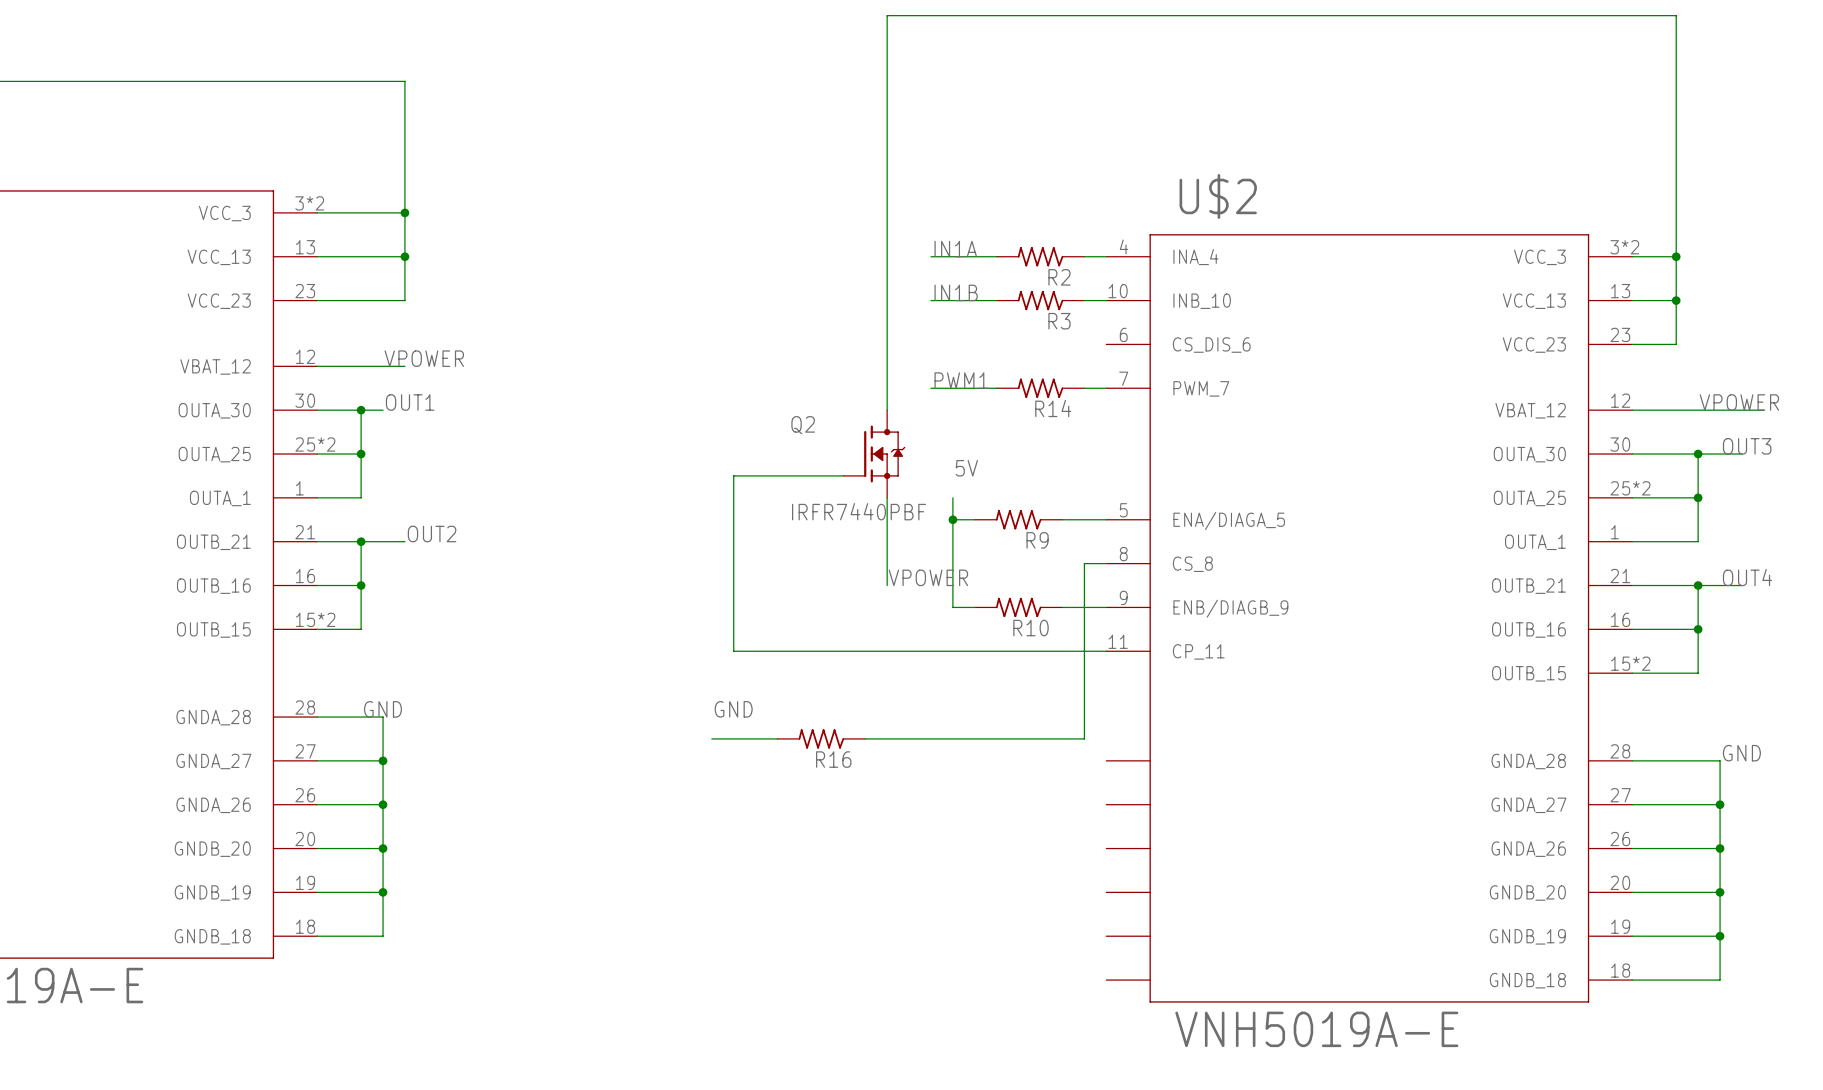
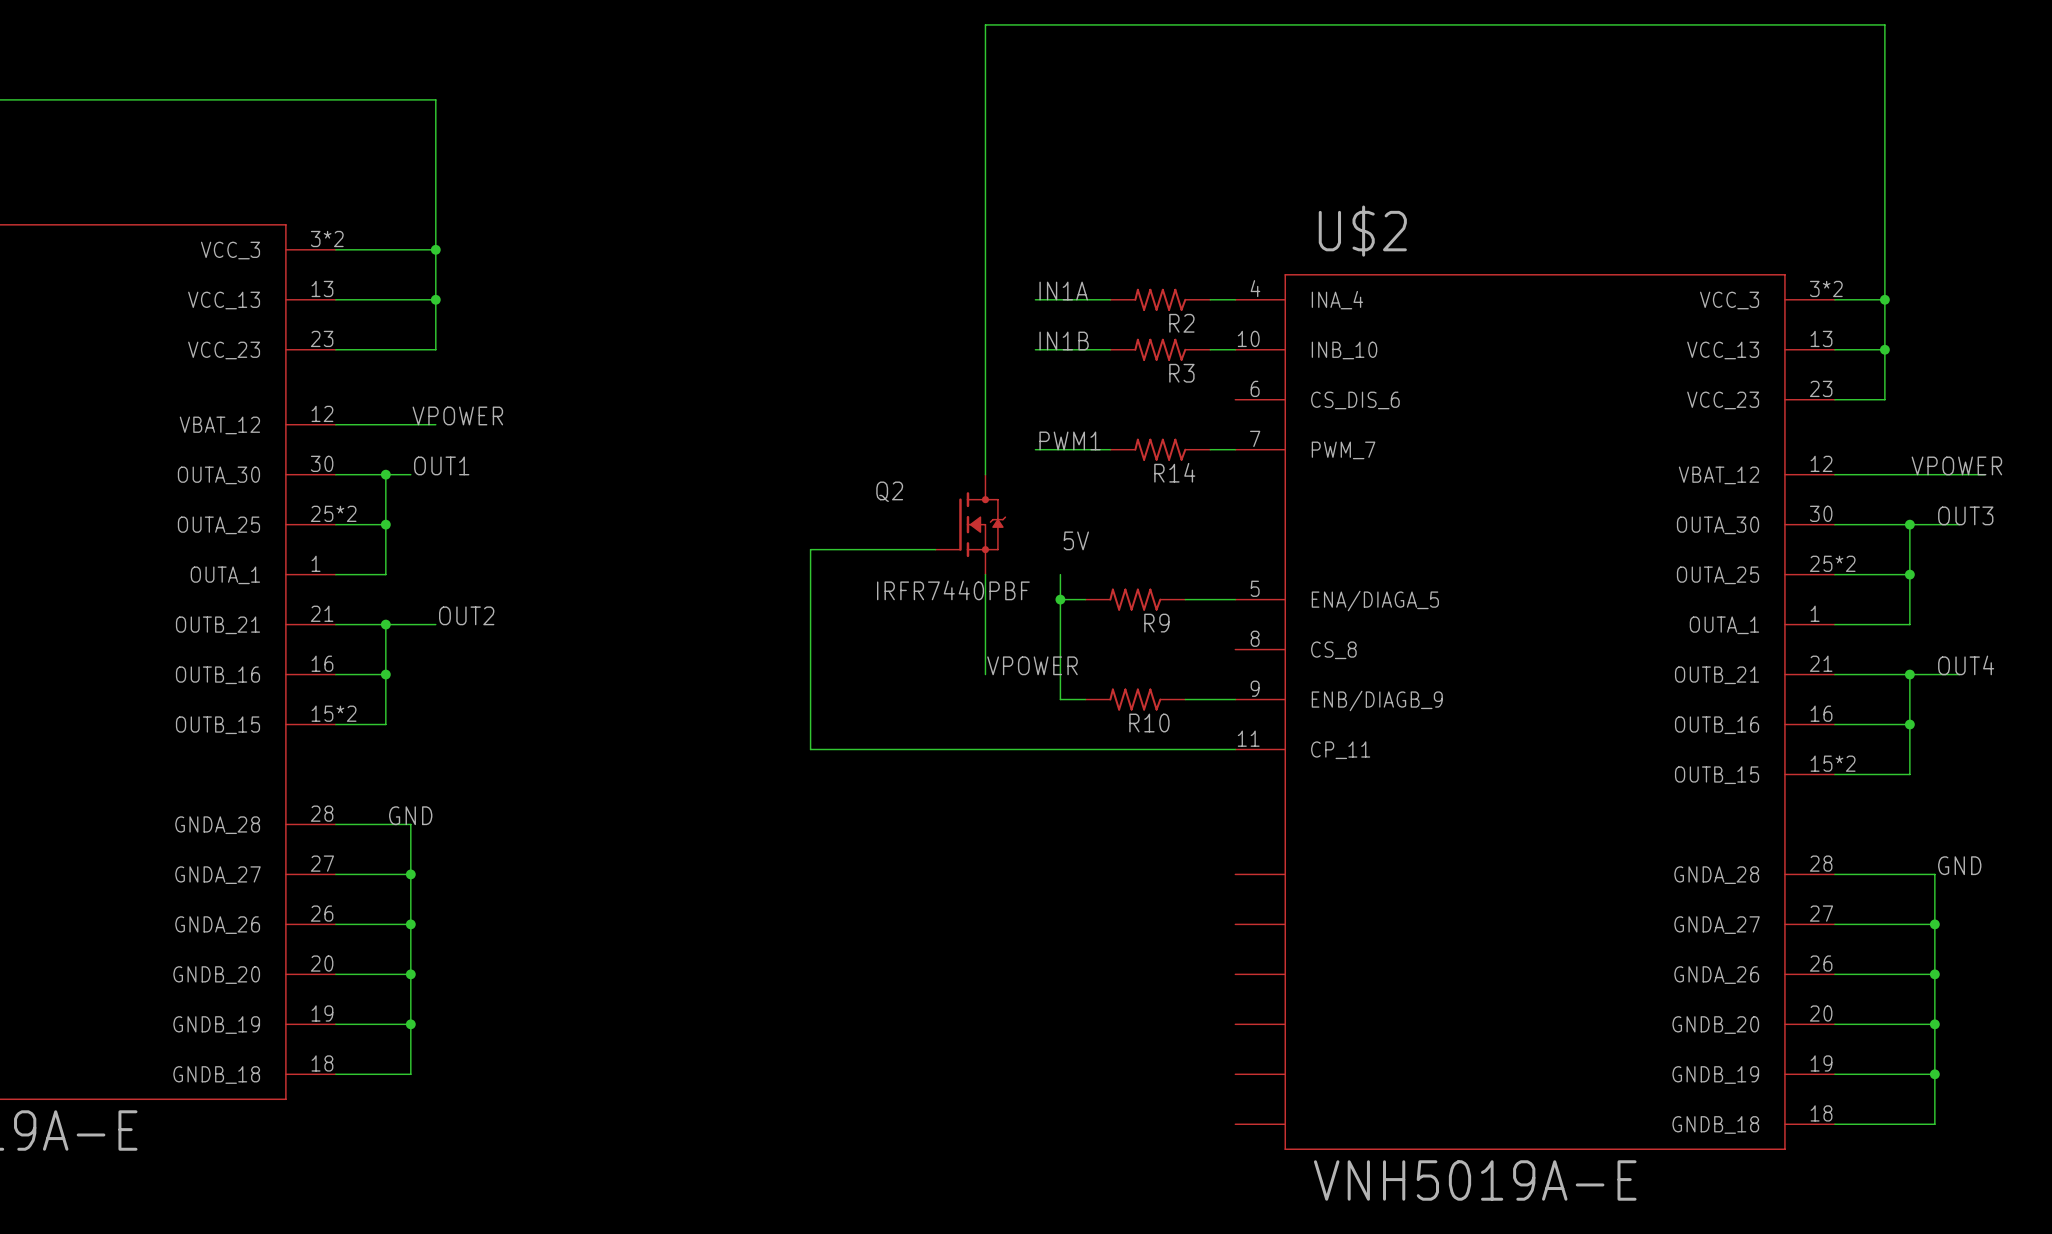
wire: (1106, 563) (1084, 563) (1084, 738) (865, 738) -> none
label: GND (733, 709) -> none
wire: (711, 738) (777, 738) -> none
R16: (821, 738) -> none

